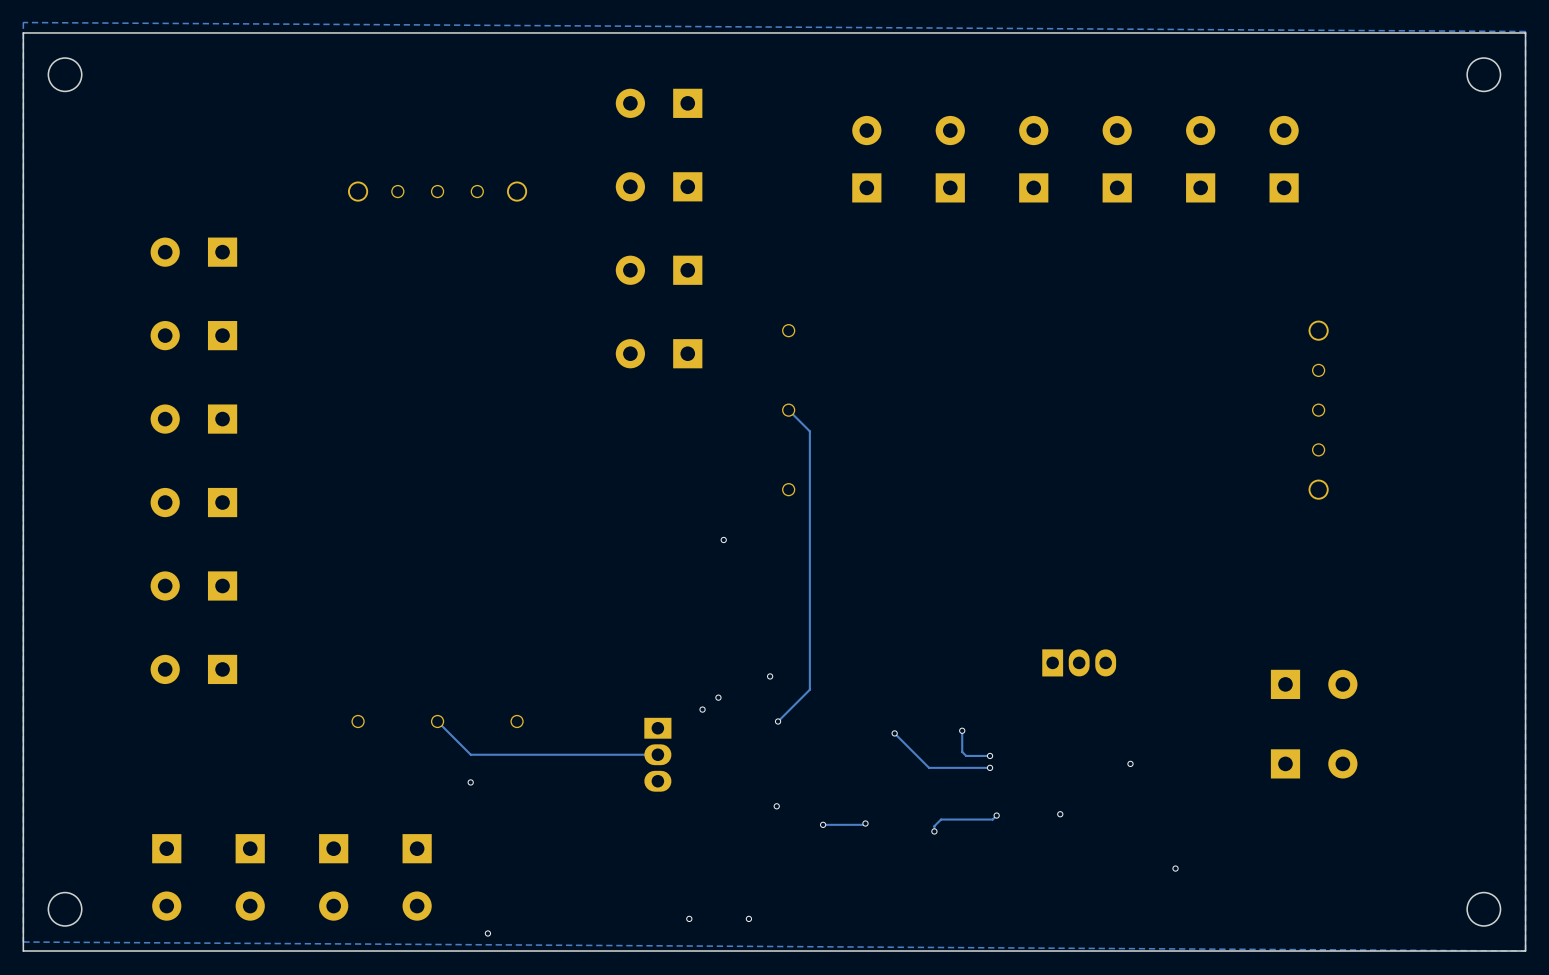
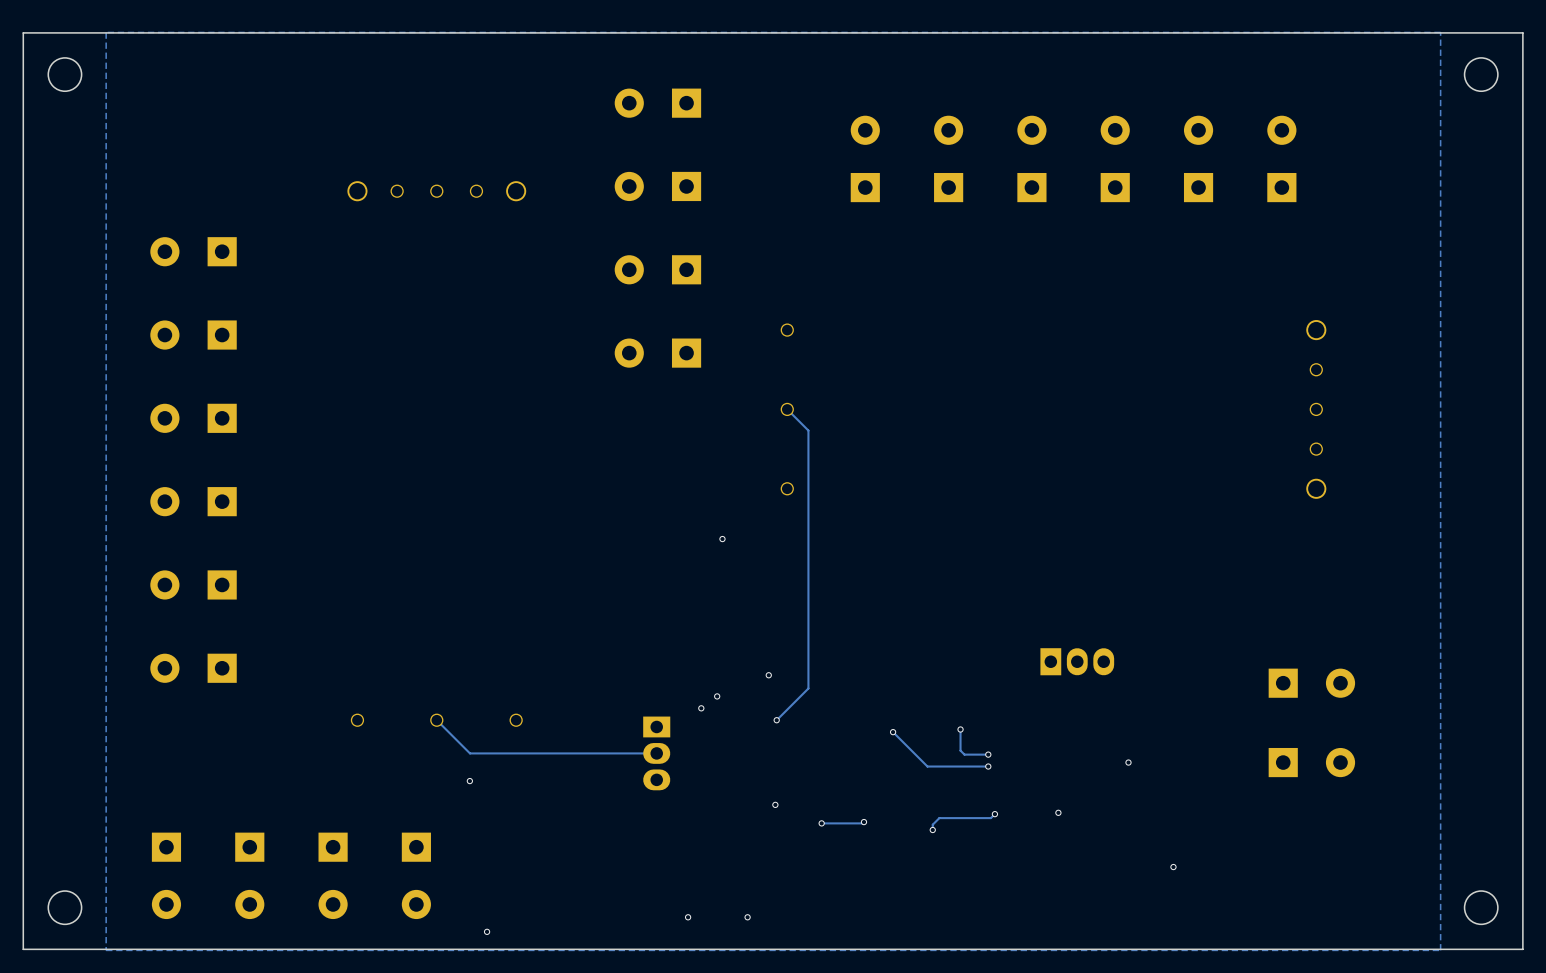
zone outline: (23, 22) (1525, 31) (1525, 951) (23, 942) (23, 22) -> (1440, 32) (1440, 950) (106, 950) (106, 32) (1440, 32)

